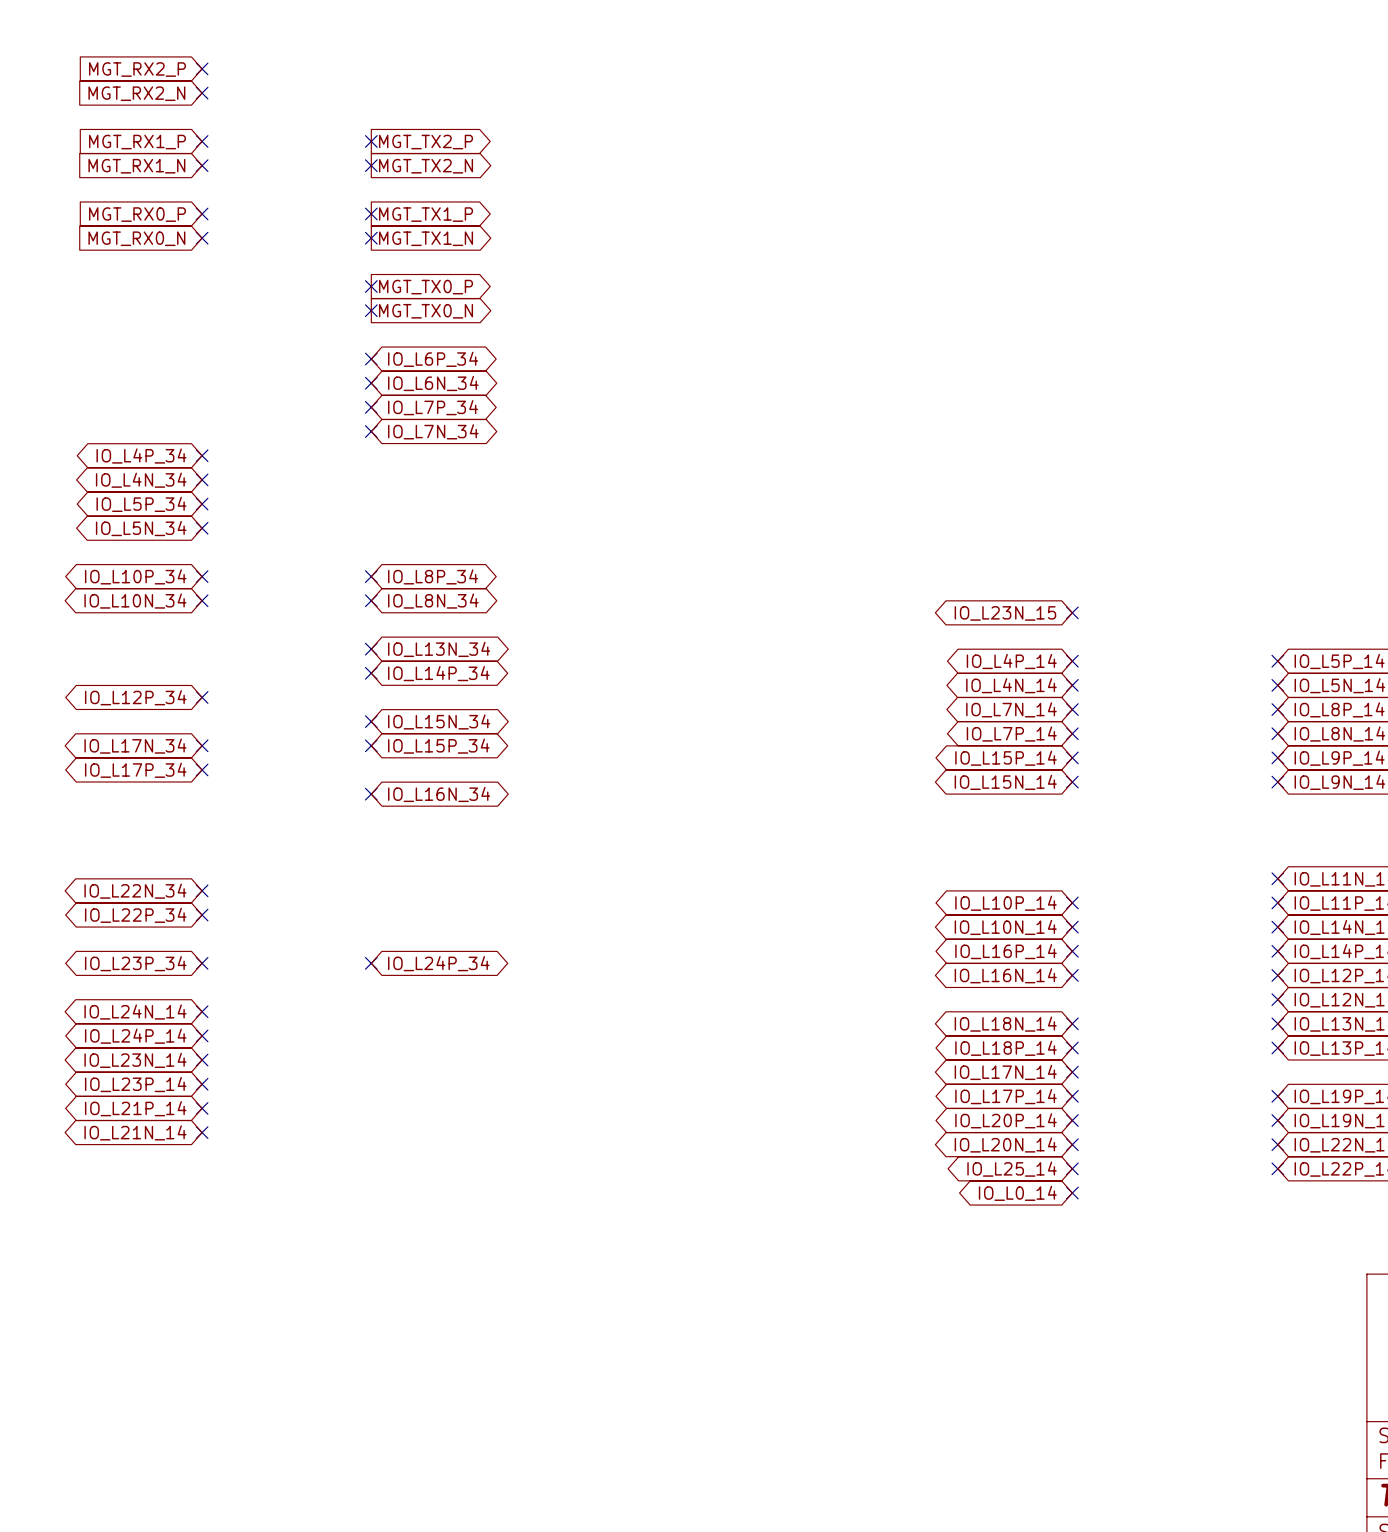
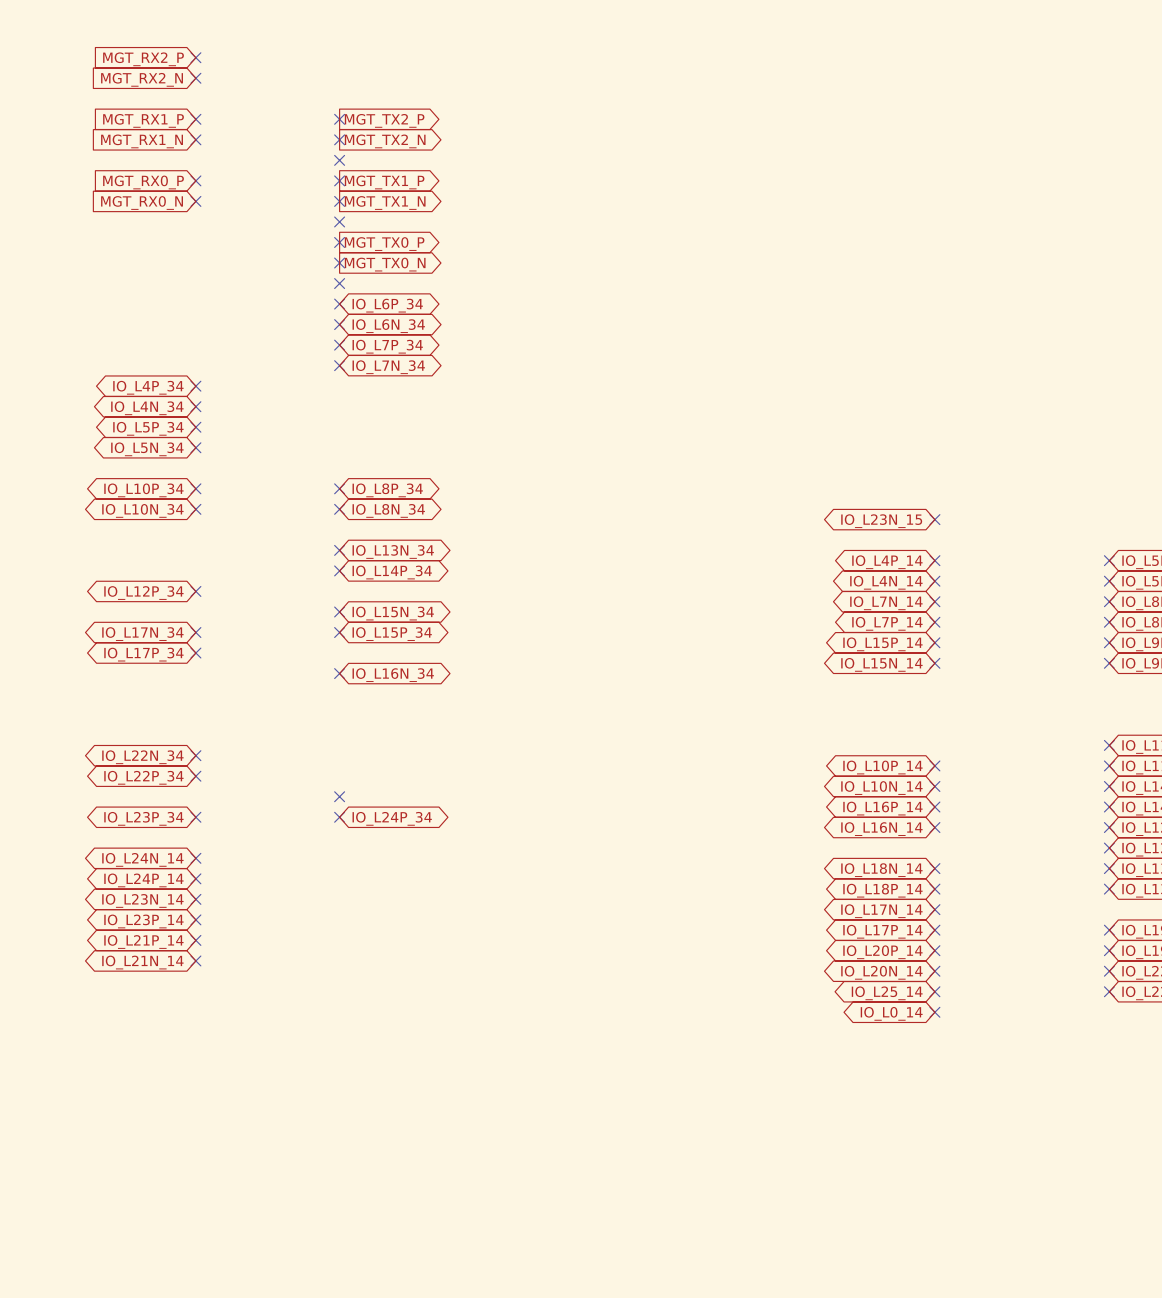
no-connect mark: none -> (339, 160)
no-connect mark: none -> (339, 221)
no-connect mark: none -> (339, 283)
no-connect mark: none -> (339, 796)

